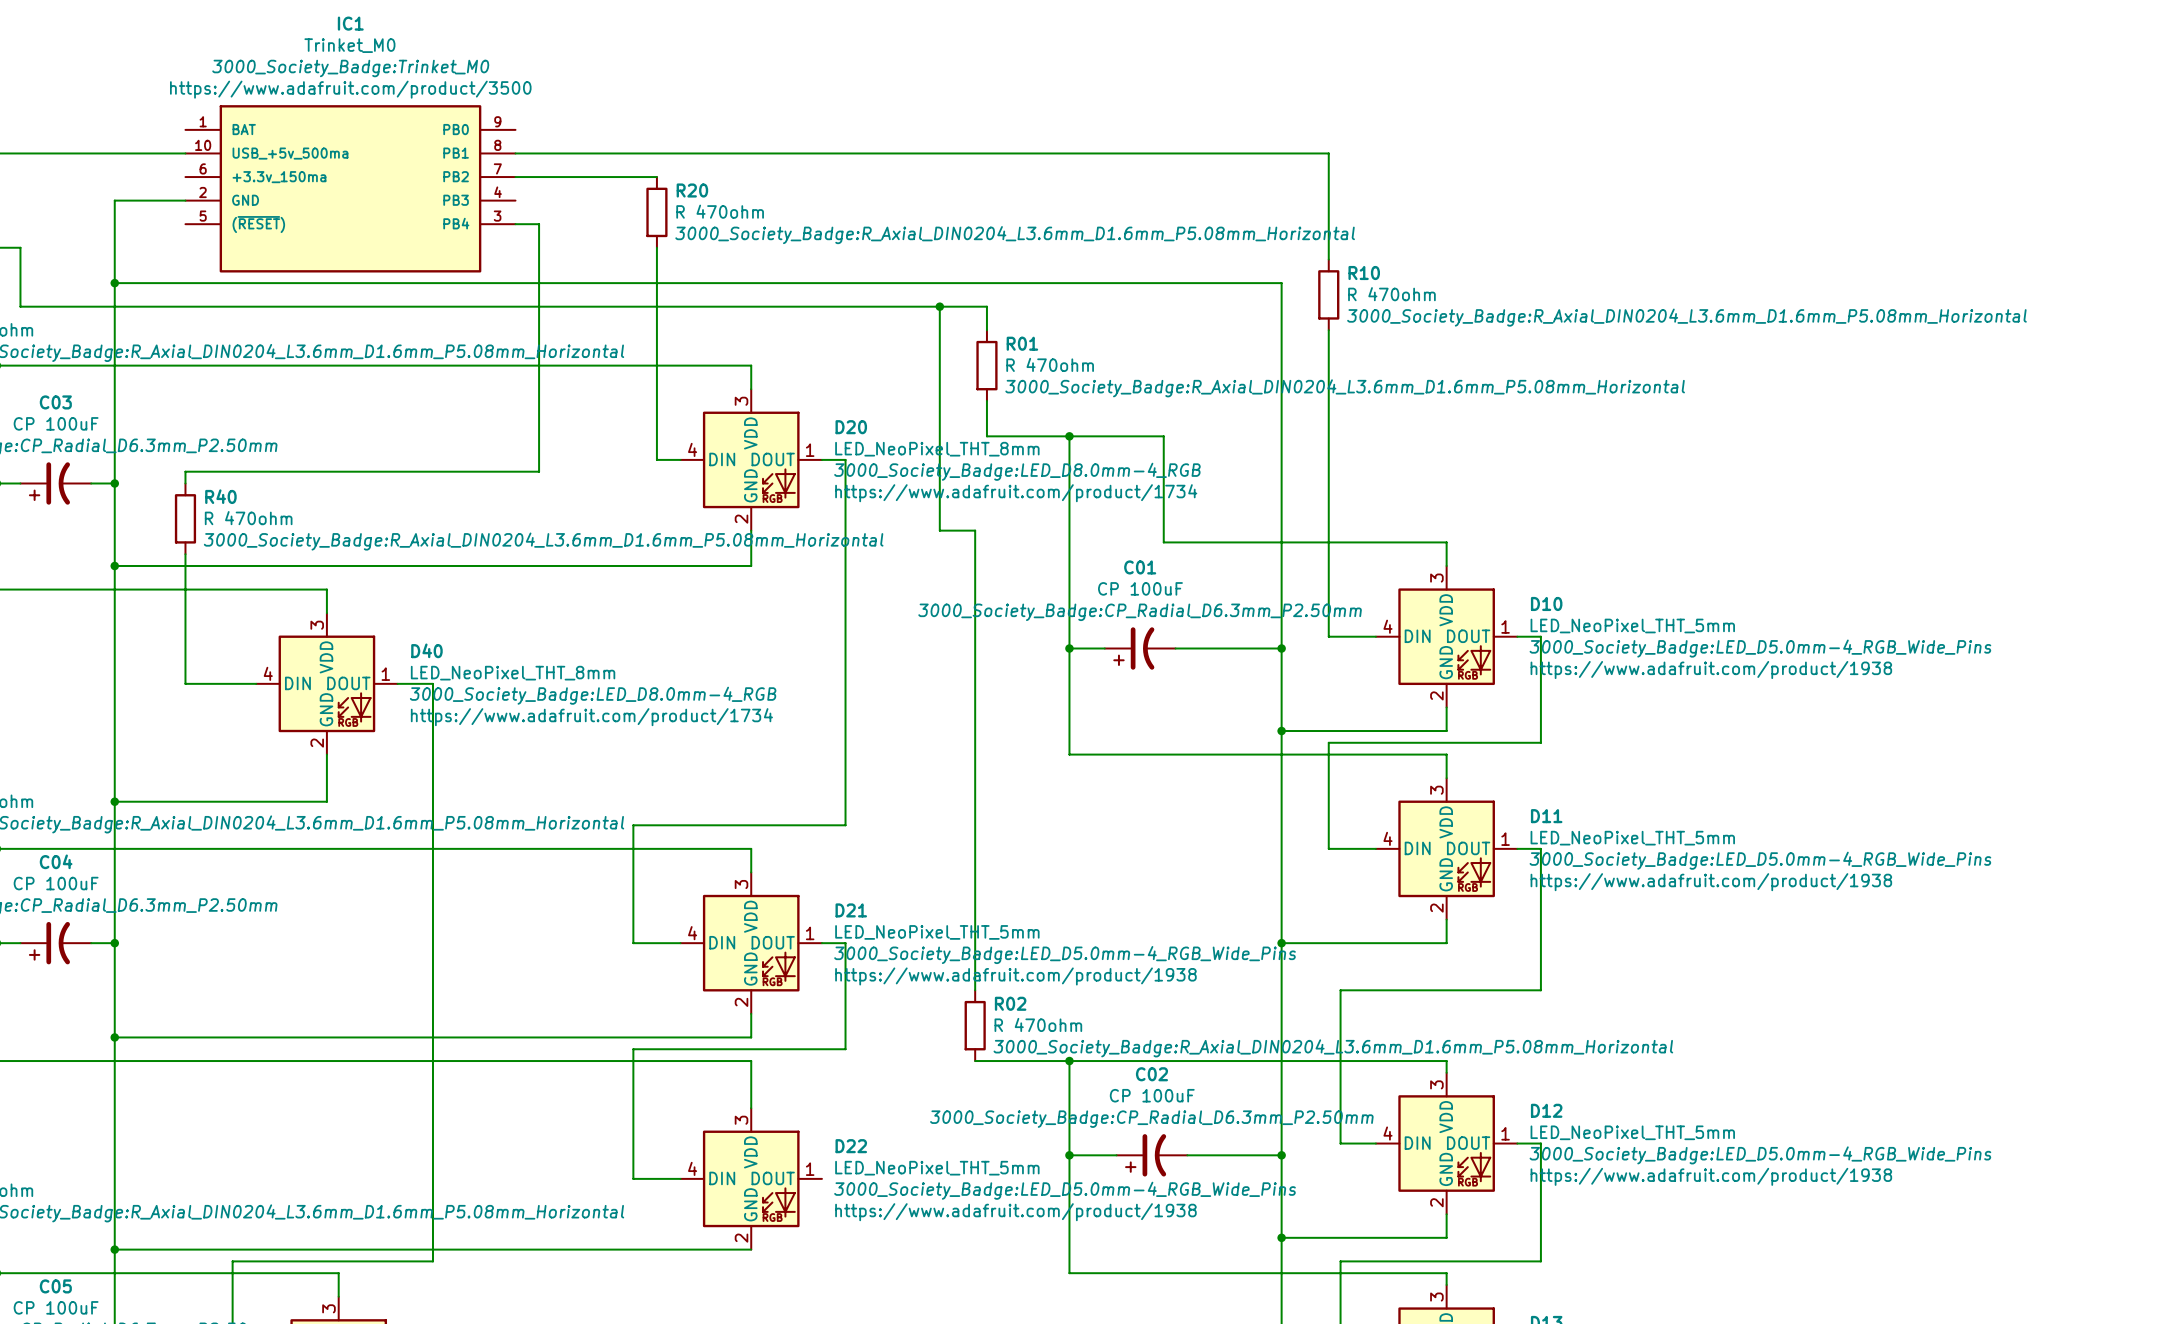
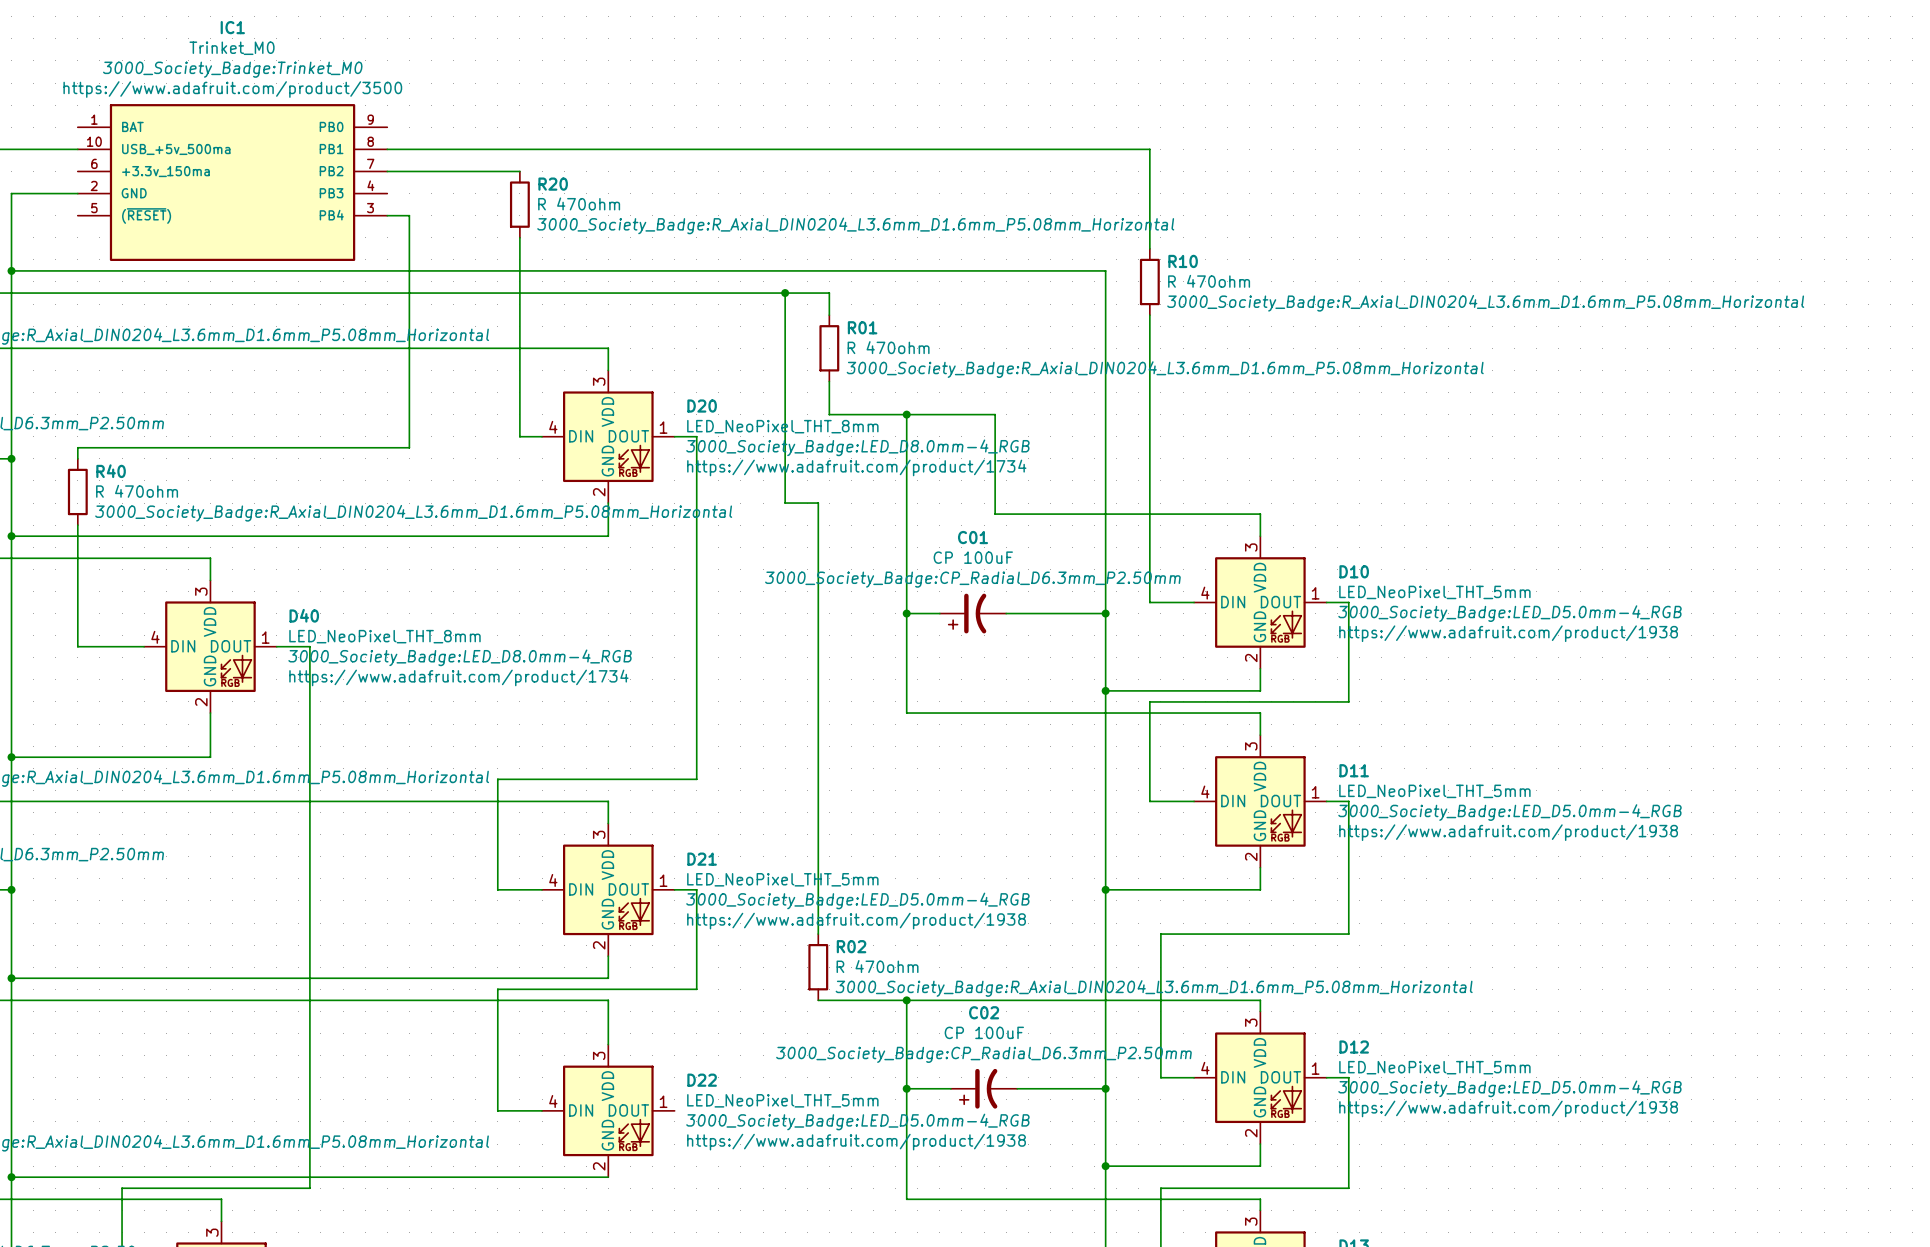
D10 text: 3000_Society_Badge:LED_D5.0mm-4_RGB_Wide_Pins (1760, 648) -> 3000_Society_Badge:LED_D5.0mm-4_RGB (1509, 613)
D11 text: 3000_Society_Badge:LED_D5.0mm-4_RGB_Wide_Pins (1760, 860) -> 3000_Society_Badge:LED_D5.0mm-4_RGB (1509, 812)
D21 text: 3000_Society_Badge:LED_D5.0mm-4_RGB_Wide_Pins (1065, 955) -> 3000_Society_Badge:LED_D5.0mm-4_RGB (857, 900)
D12 text: 3000_Society_Badge:LED_D5.0mm-4_RGB_Wide_Pins (1760, 1155) -> 3000_Society_Badge:LED_D5.0mm-4_RGB (1509, 1088)
D22 text: 3000_Society_Badge:LED_D5.0mm-4_RGB_Wide_Pins (1065, 1190) -> 3000_Society_Badge:LED_D5.0mm-4_RGB (857, 1121)

